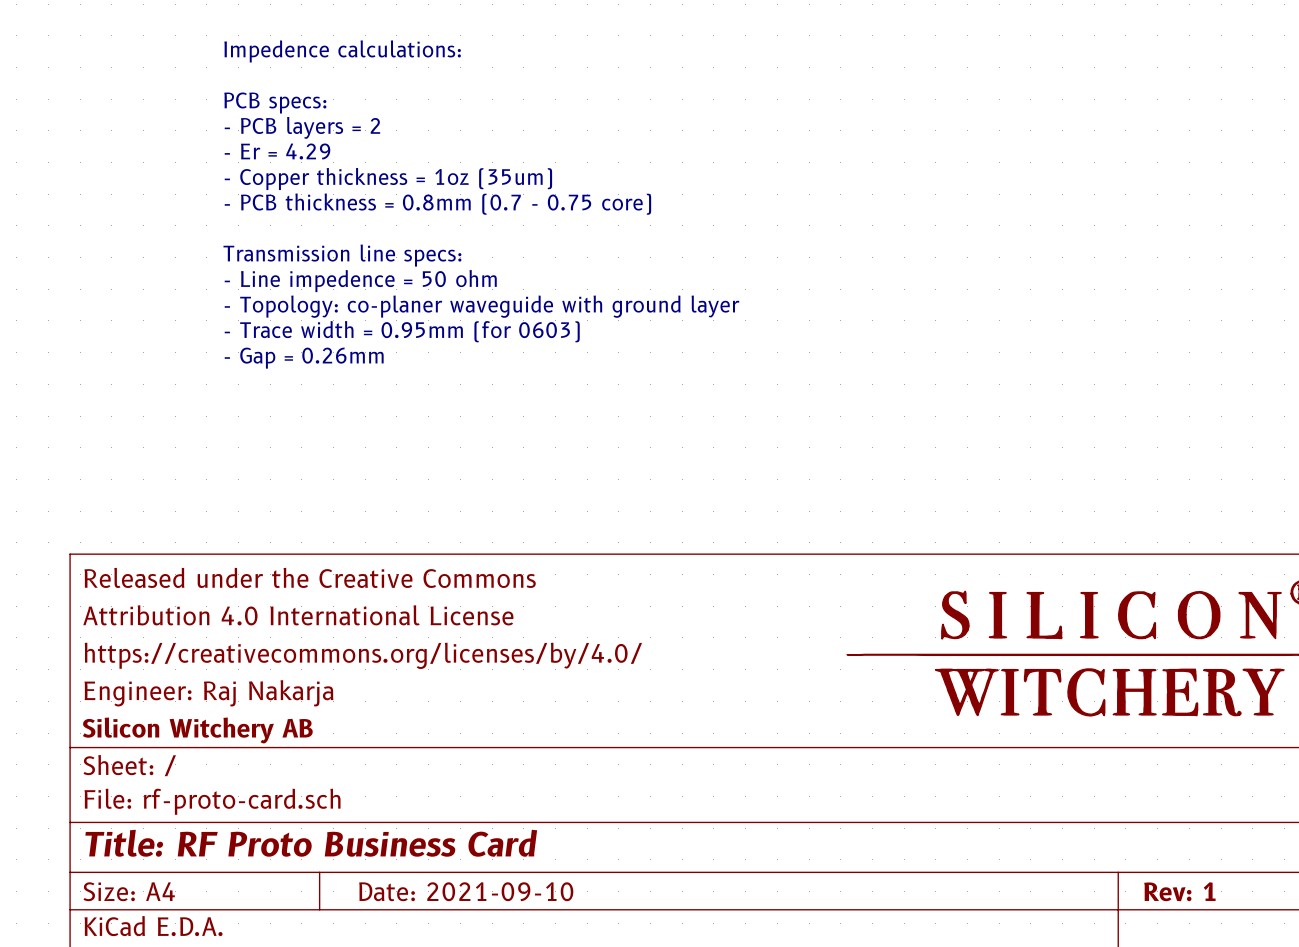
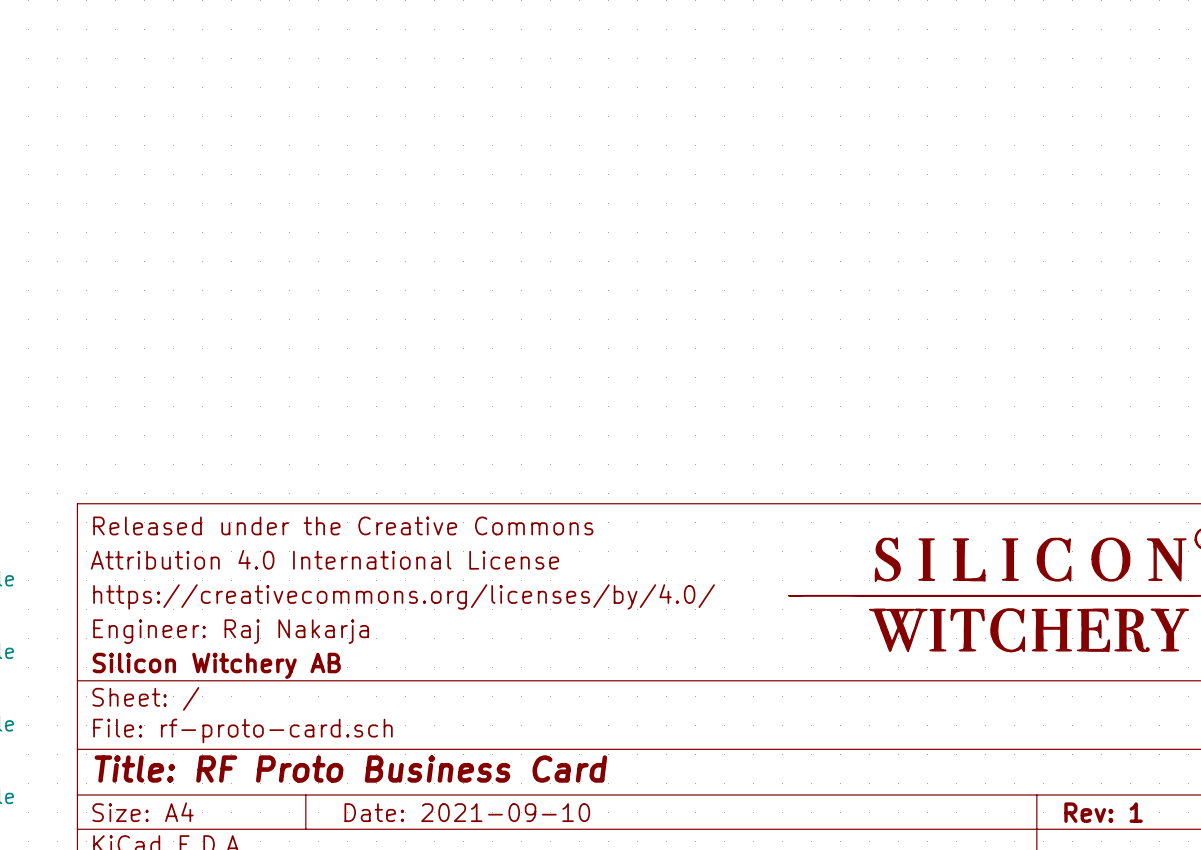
text: Impedence calculations: (342, 51) -> none
text: PCB specs: (275, 103) -> none
text: - PCB layers = 2 (302, 127) -> none
text: - Er = 4.29 (277, 151) -> none
text: - Copper thickness = 1oz (35um) (388, 179) -> none
text: - PCB thickness = 0.8mm (0.7 - 0.75 core) (437, 204) -> none
text: Transmission line specs: (342, 255) -> none
text: - Line impedence = 50 ohm (360, 281) -> none
text: - Topology: co-planer waveguide with ground layer (481, 306) -> none
text: - Trace width = 0.95mm (for 0603) (402, 331) -> none
text: - Gap = 0.26mm (304, 358) -> none

